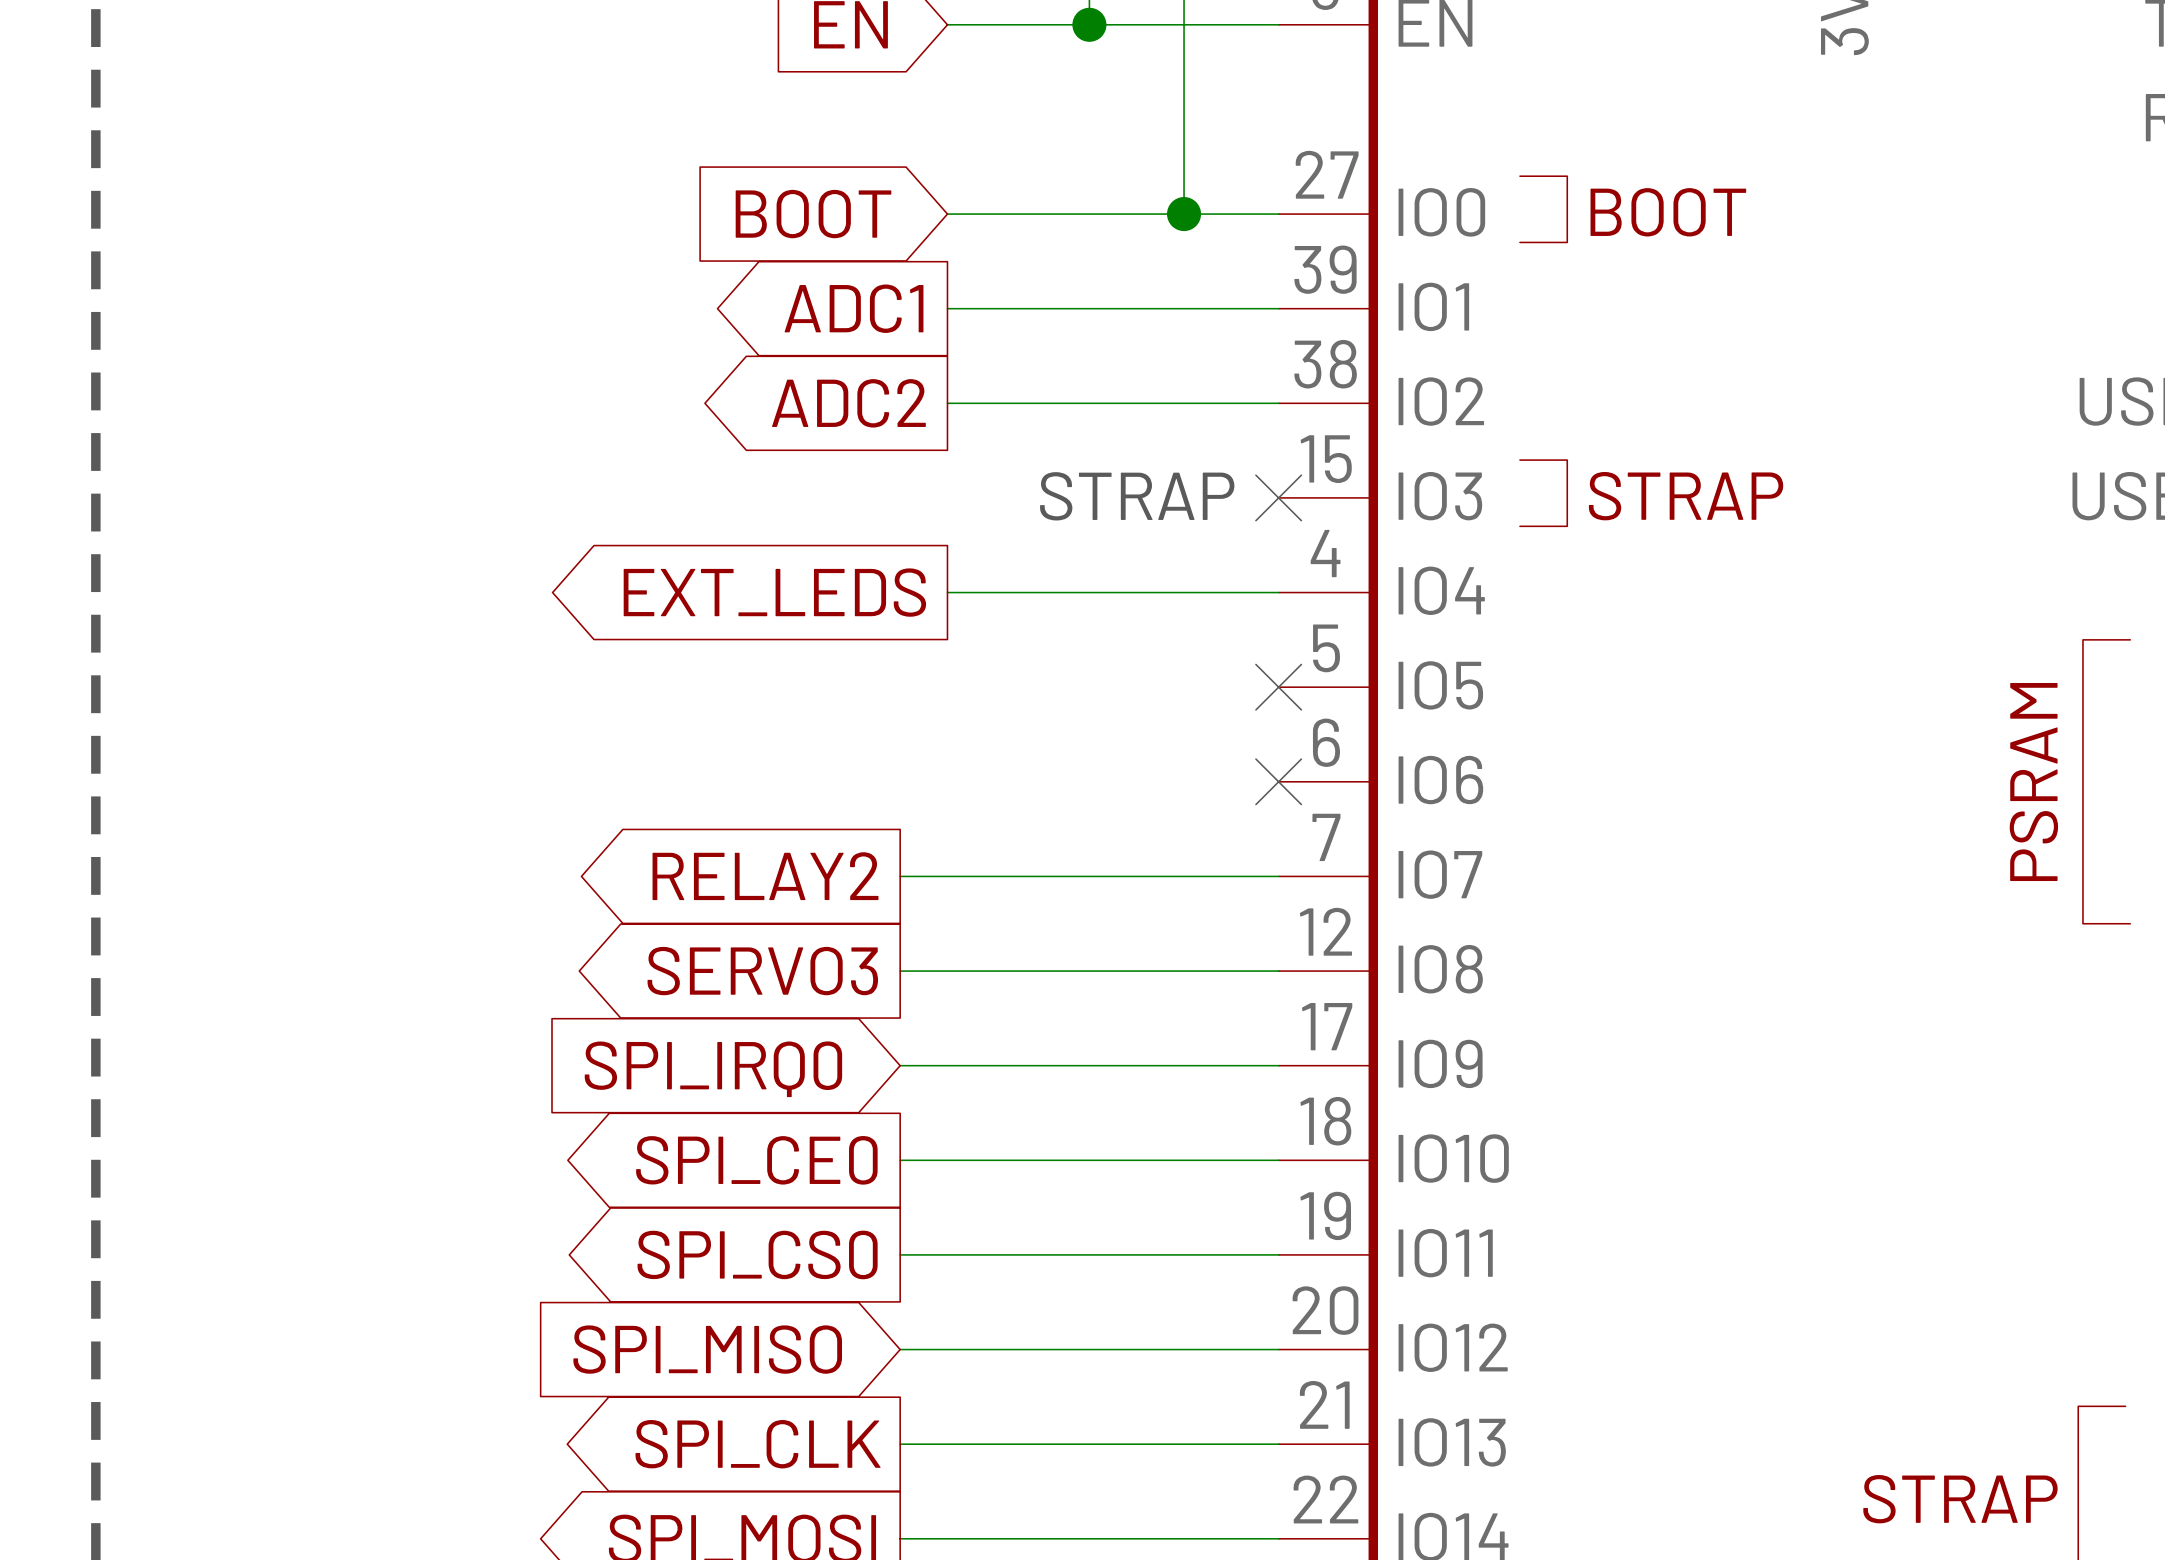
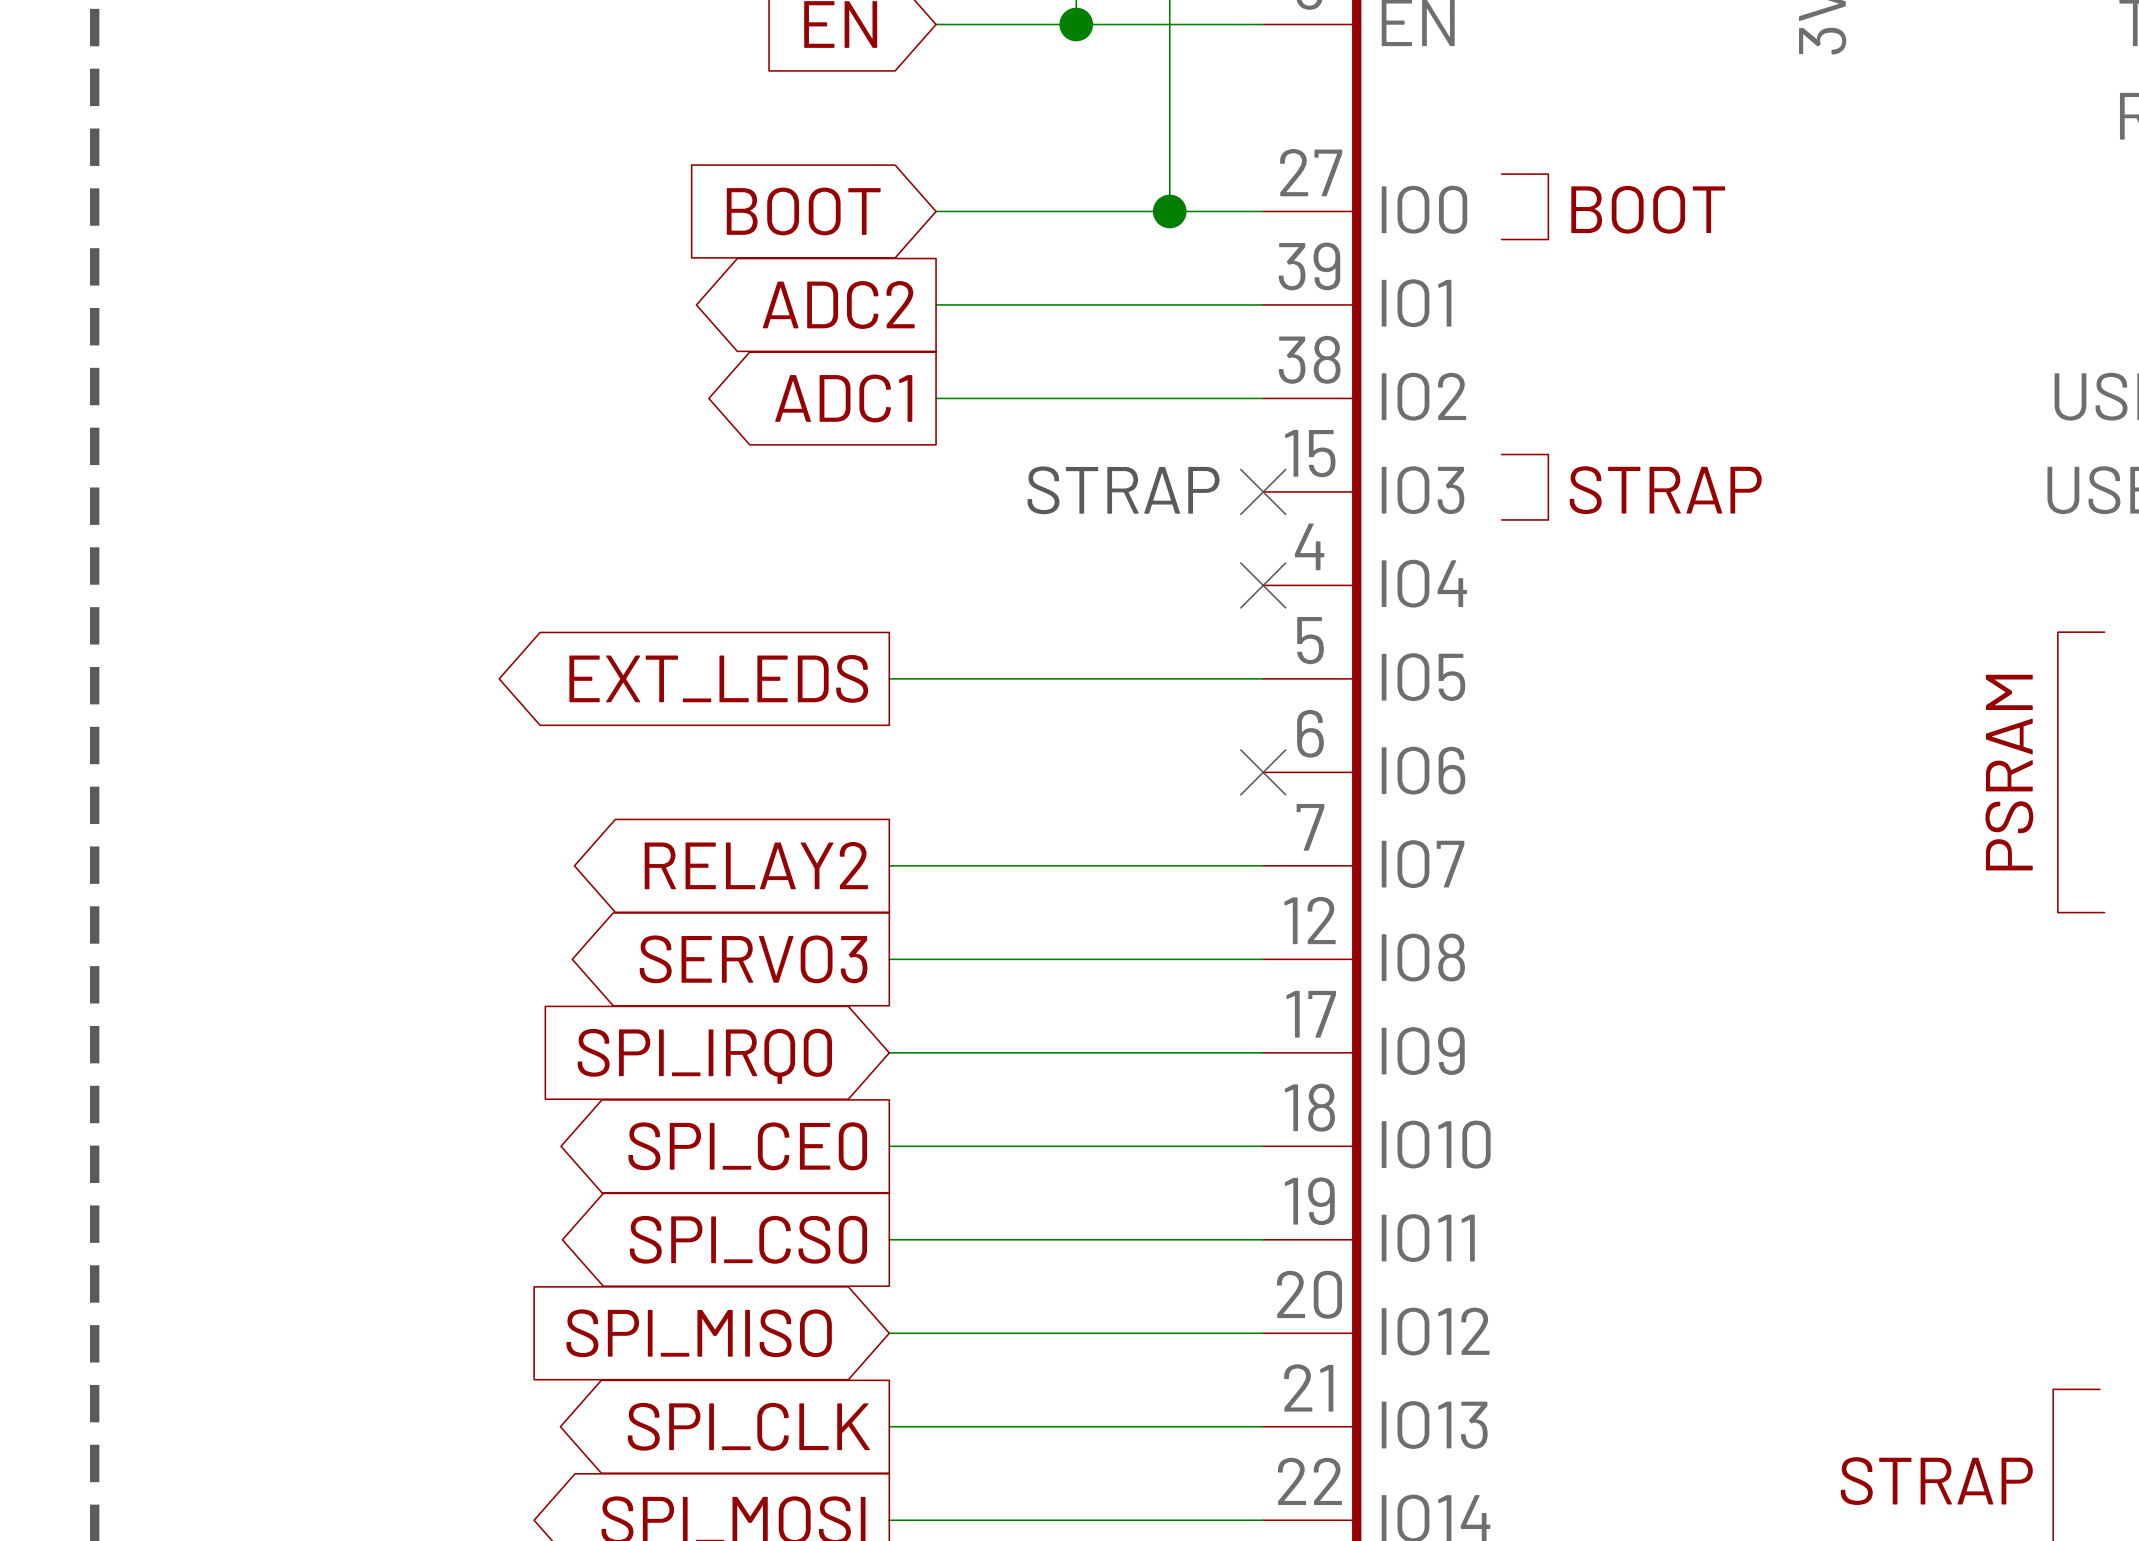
global label: ADC1 (853, 308) -> ADC2 (838, 304)
global label: ADC2 (848, 403) -> ADC1 (843, 398)
global label position: EXT_LEDS (774, 592) -> EXT_LEDS (718, 678)
wire: (947, 592) (1278, 592) -> none
wire: none -> (889, 678) (1263, 678)
no-connect mark position: (1278, 687) -> (1263, 585)

